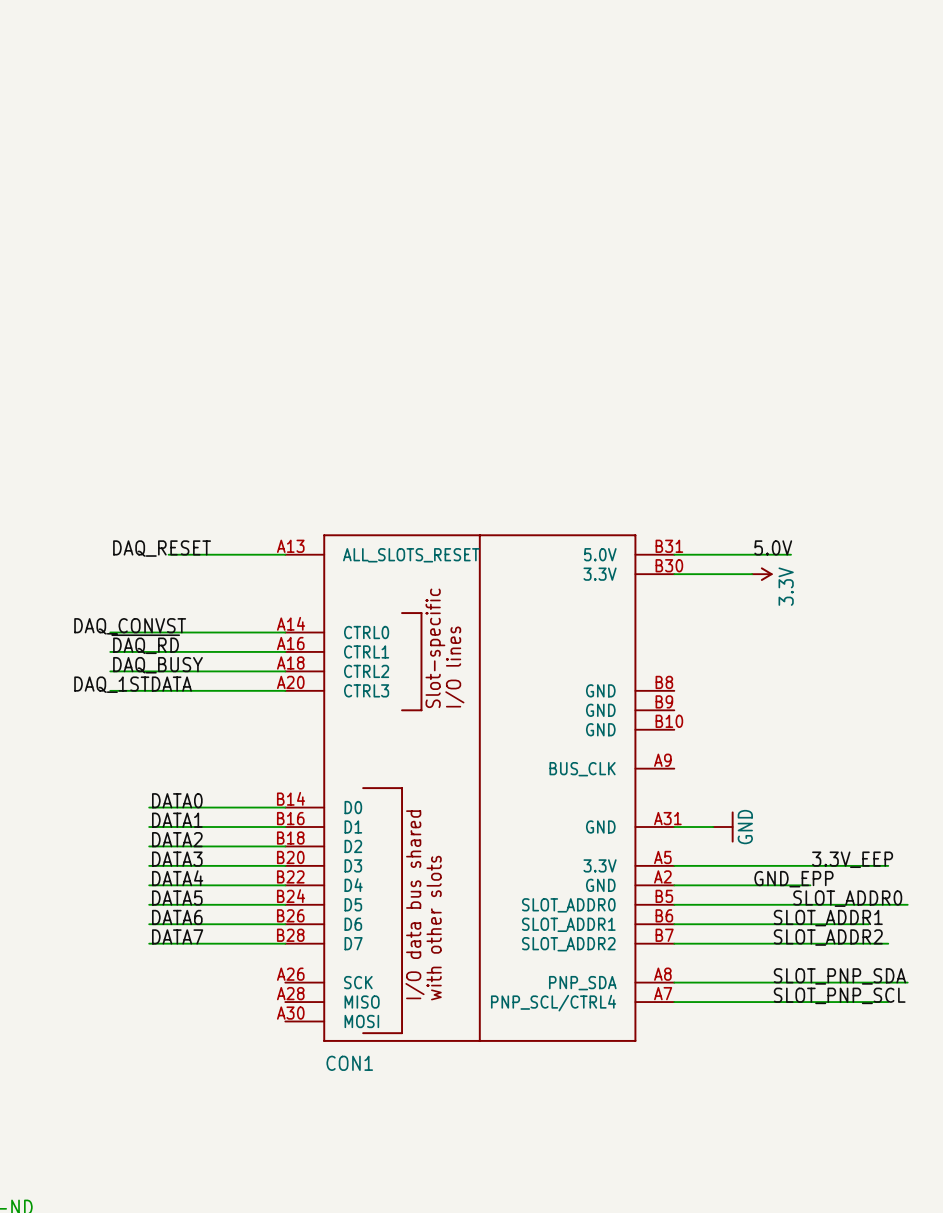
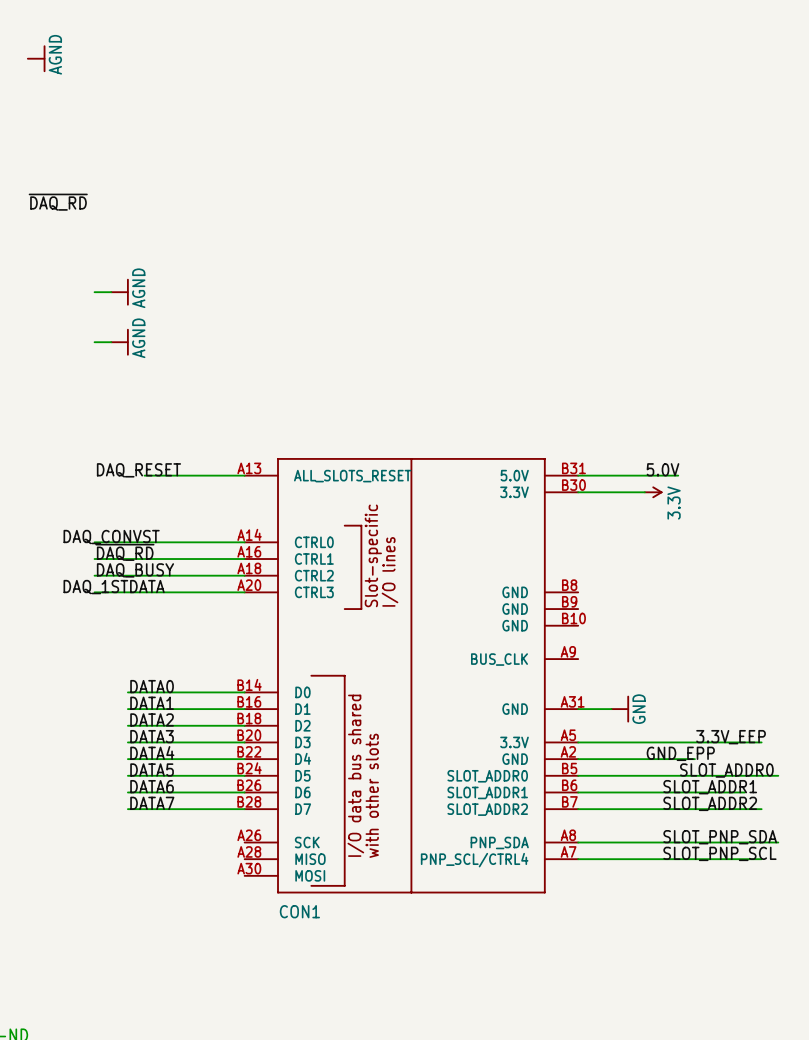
power symbol: none -> AGND (36, 58)
label: none -> ~{DAQ_RD} (58, 202)
wire: none -> (94, 292) (111, 292)
power symbol: none -> AGND (120, 292)
wire: none -> (94, 342) (111, 342)
power symbol: none -> AGND (120, 342)

